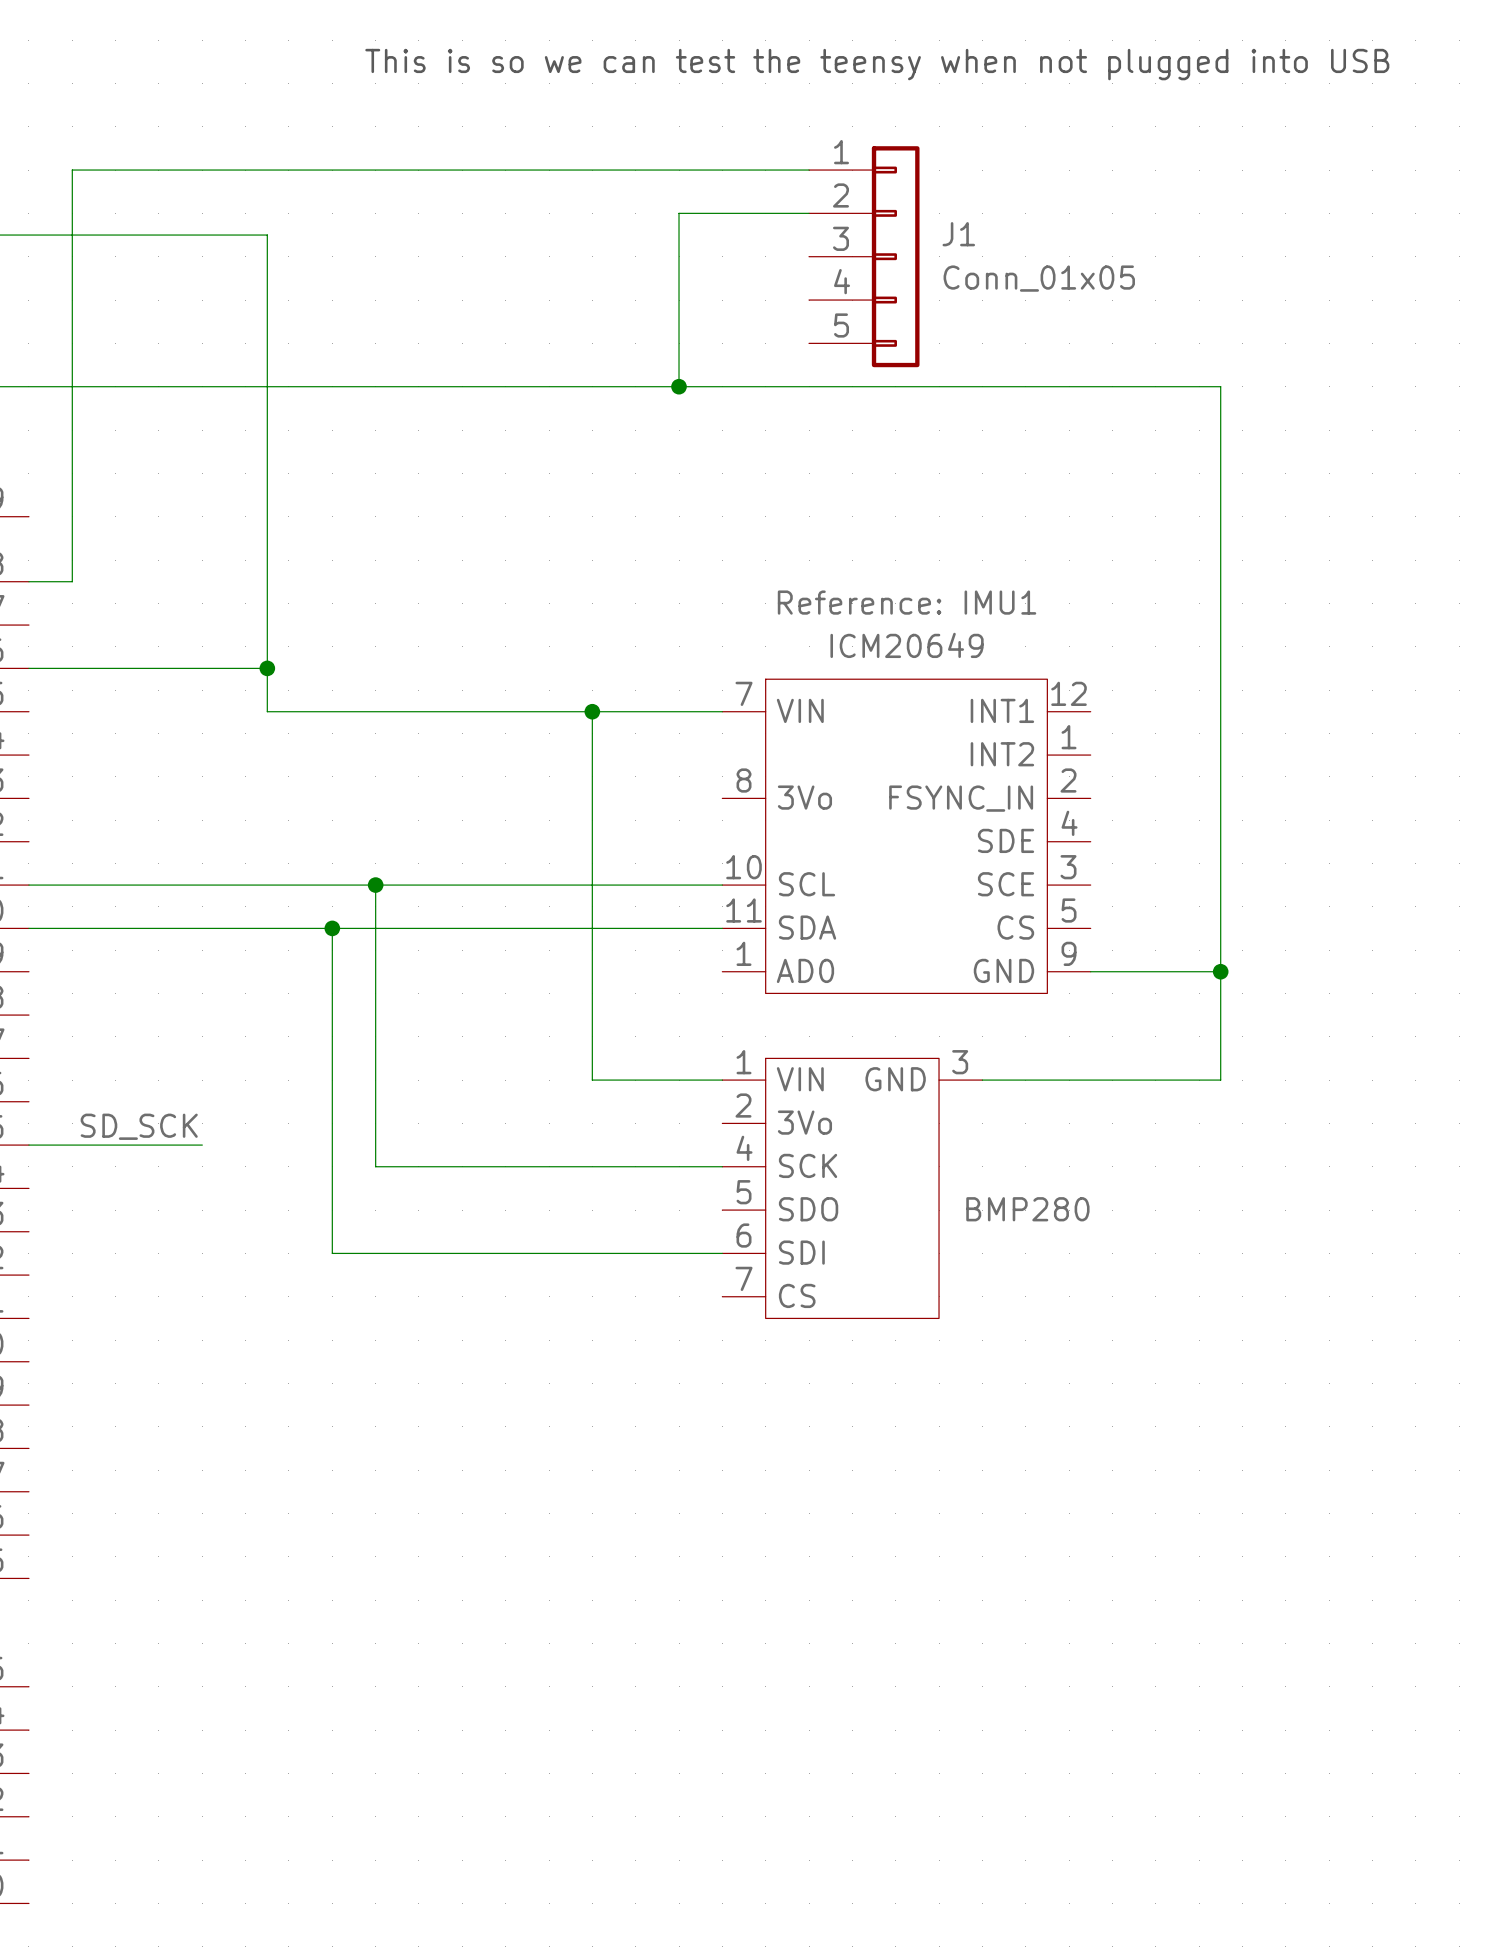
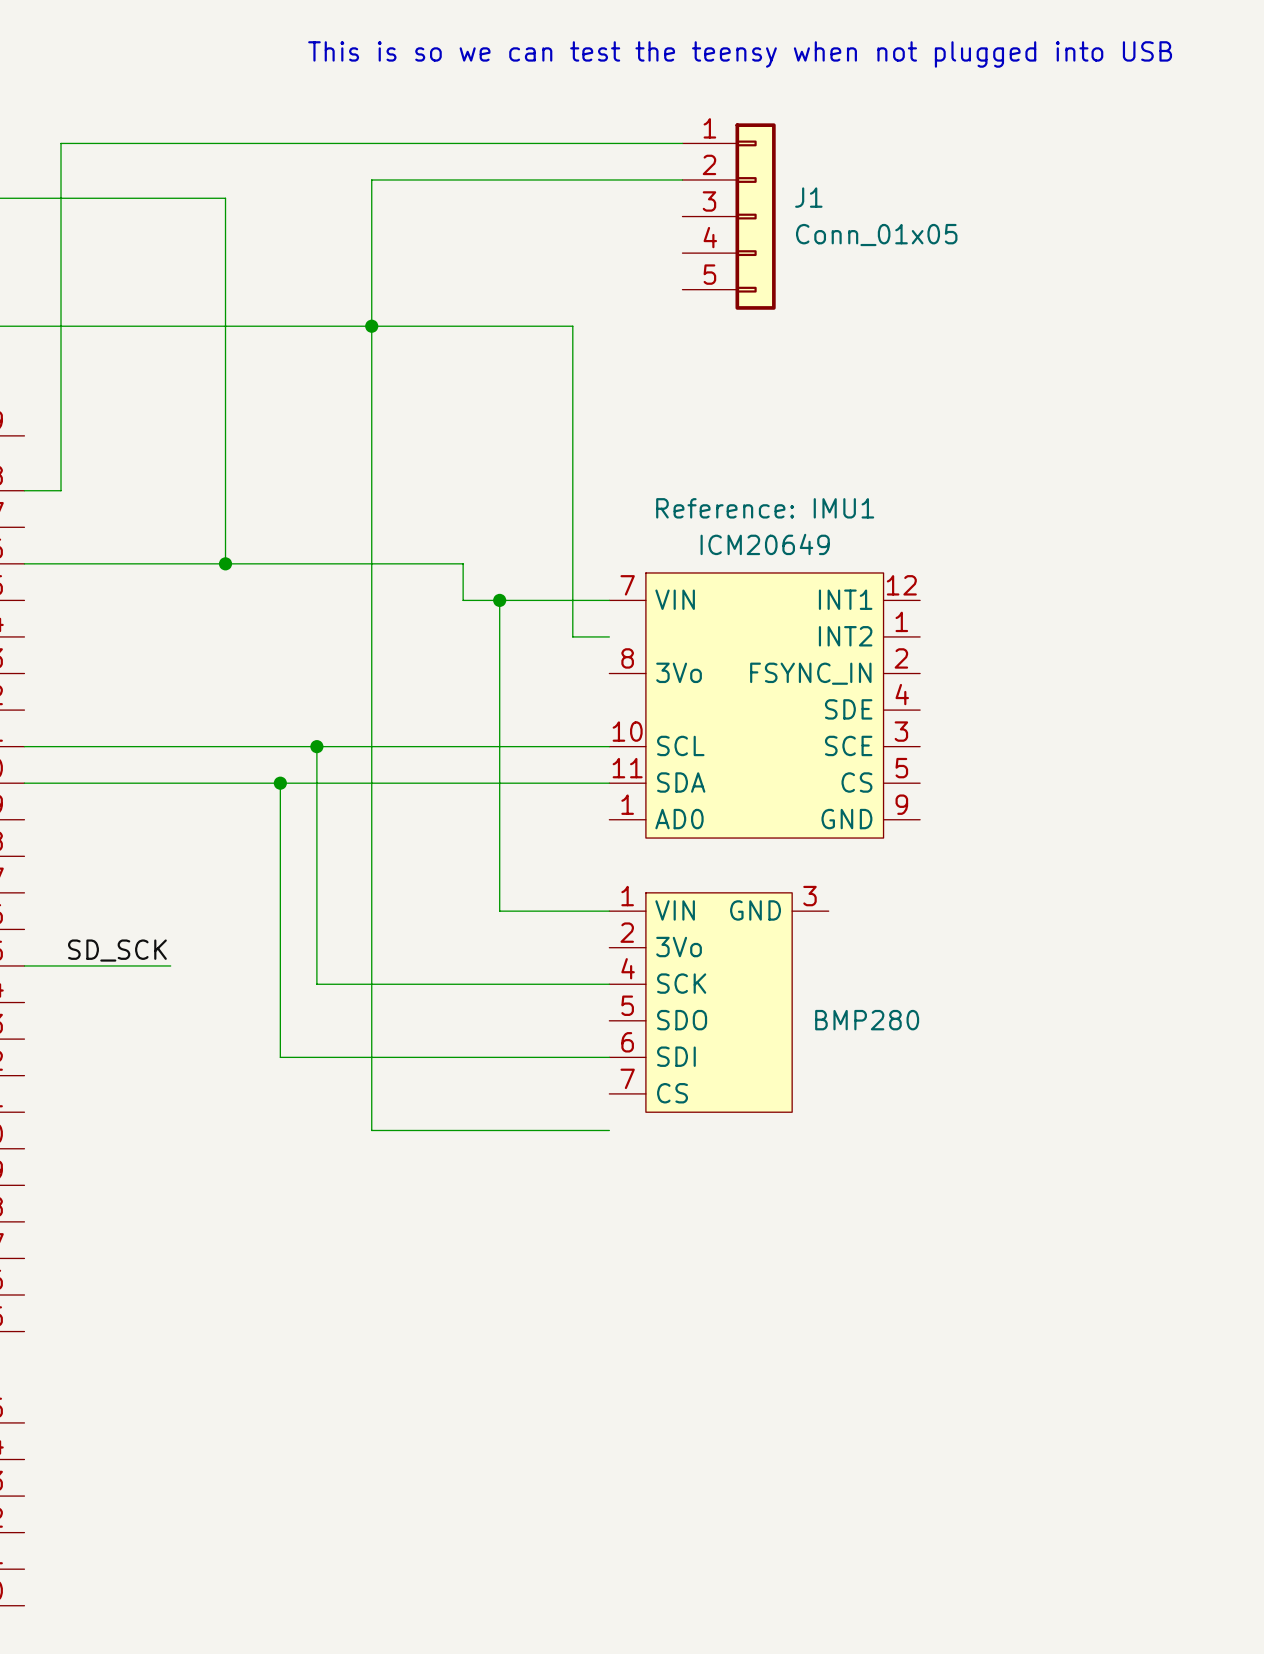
wire: (679, 213) (679, 386) (1220, 386) (1220, 1080) (982, 1080) -> (572, 179) (371, 179) (371, 1130) (609, 1130)
junction: none -> (371, 326)
wire: none -> (572, 326) (572, 636) (609, 636)
junction: (679, 386) -> none
wire: (267, 668) (267, 711) (549, 711) -> (225, 563) (463, 563) (463, 600)
wire: (1090, 971) (1220, 971) -> none
junction: (1220, 971) -> none

